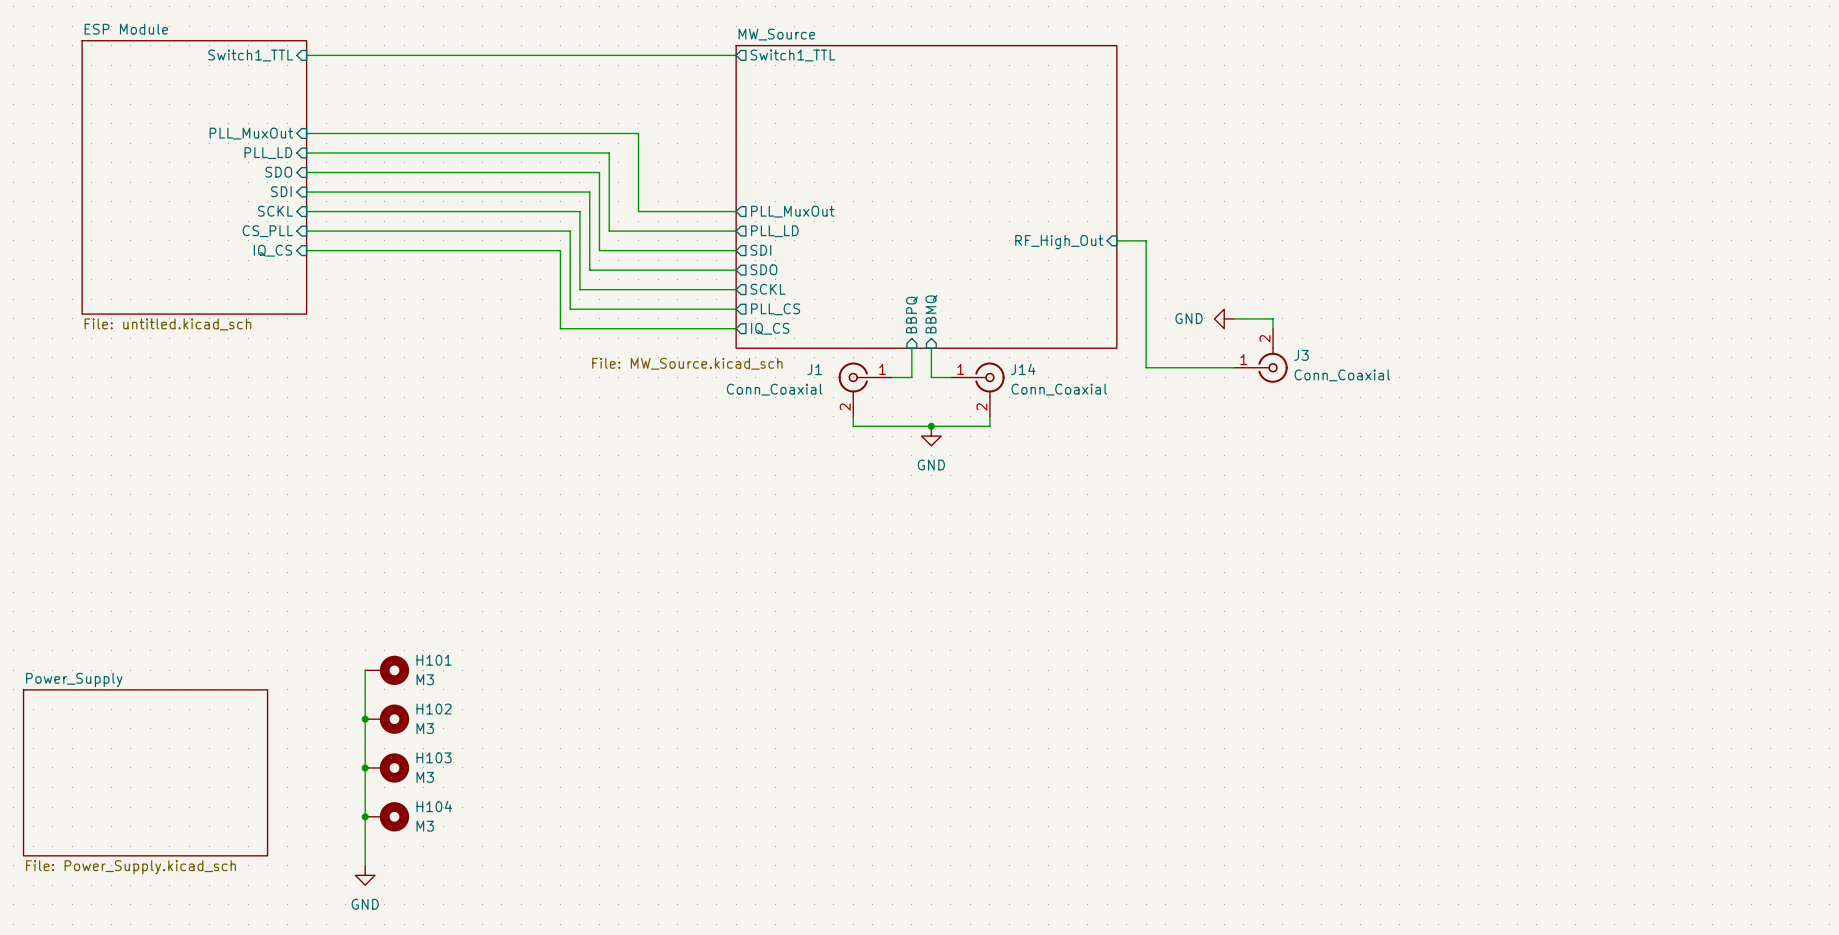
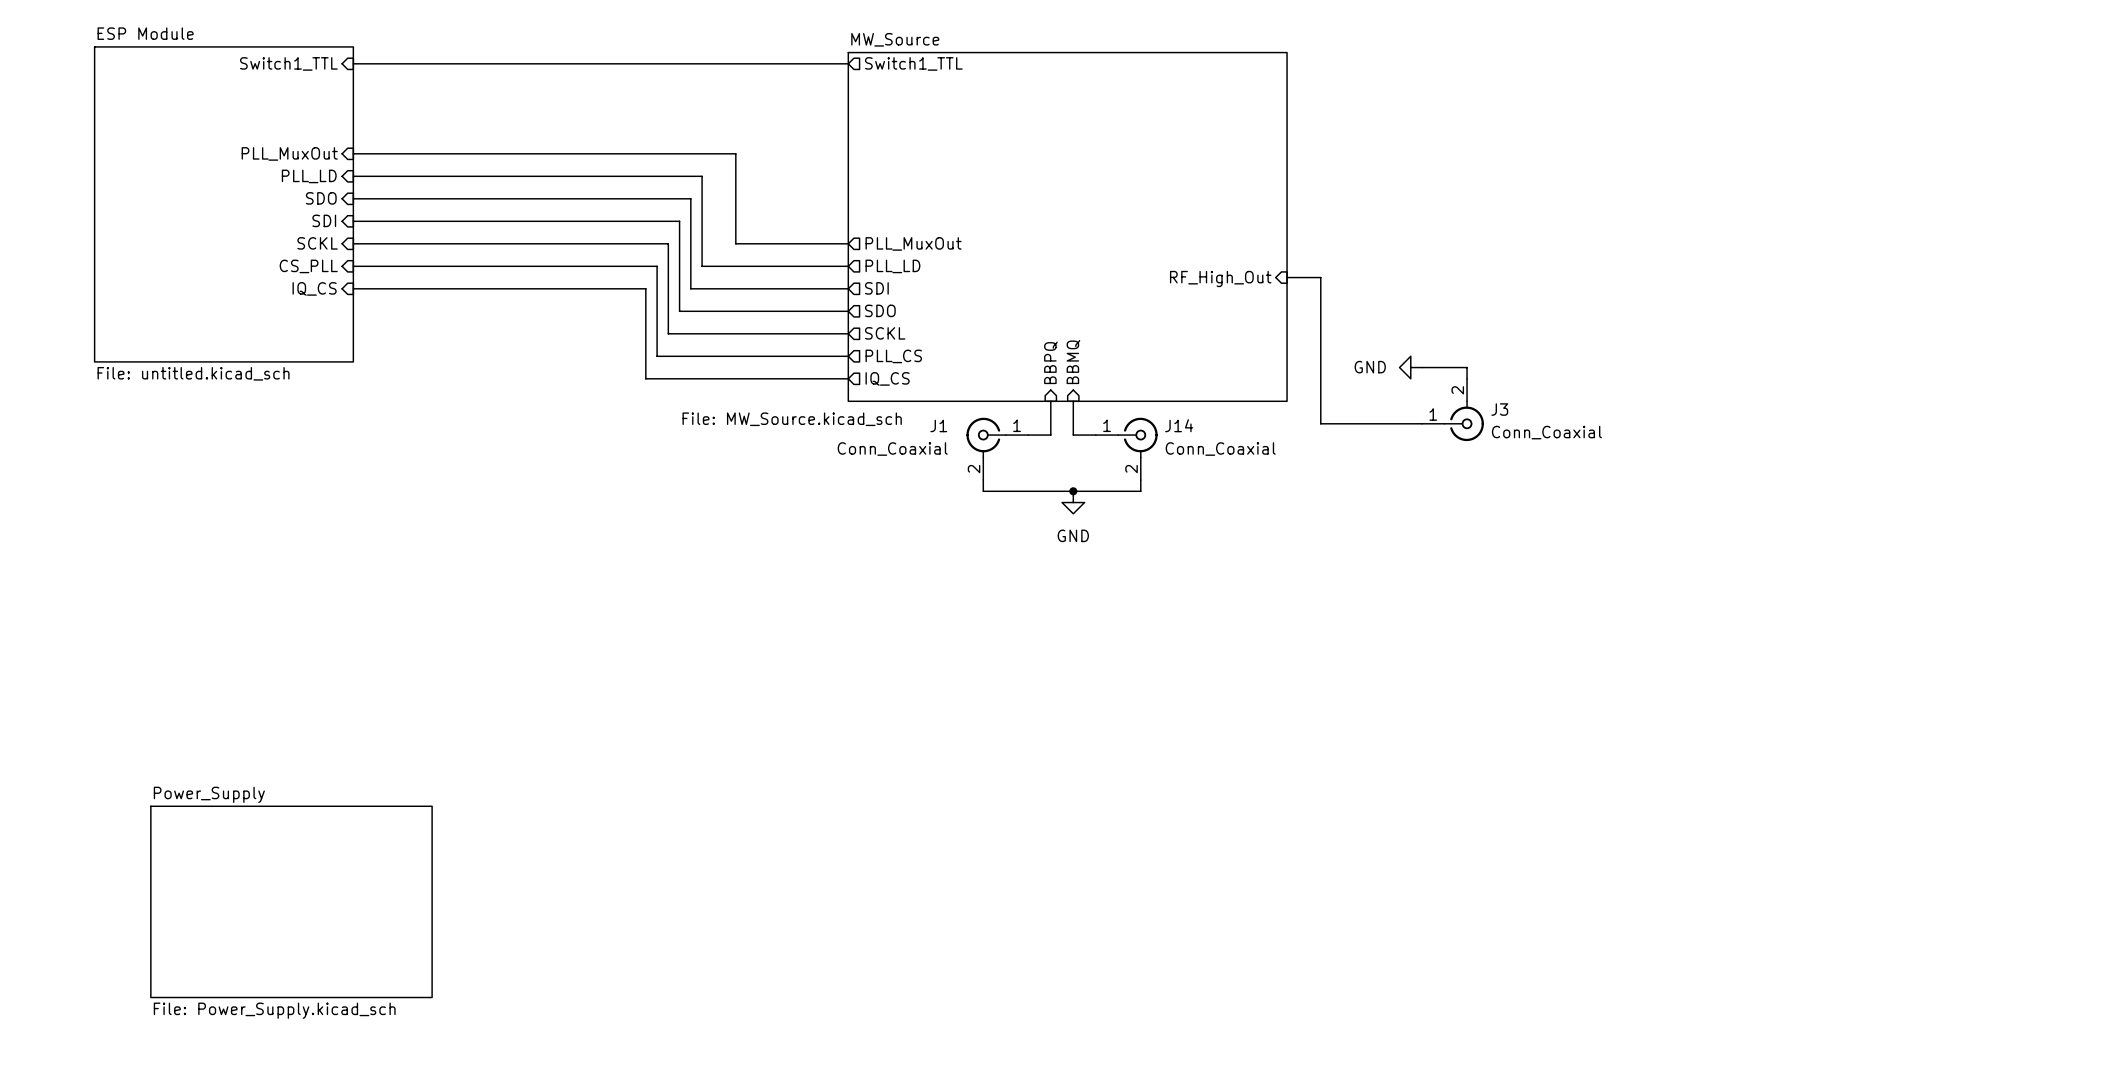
wire: (365, 670) (365, 865) -> none
H101: M3 (387, 670) -> none
junction: (365, 719) -> none
H102: M3 (387, 719) -> none
junction: (365, 767) -> none
H103: M3 (387, 767) -> none
sheet Power_Supply position: (145, 772) -> (291, 901)
junction: (365, 816) -> none
H104: M3 (387, 816) -> none
power symbol: GND (365, 875) -> none

